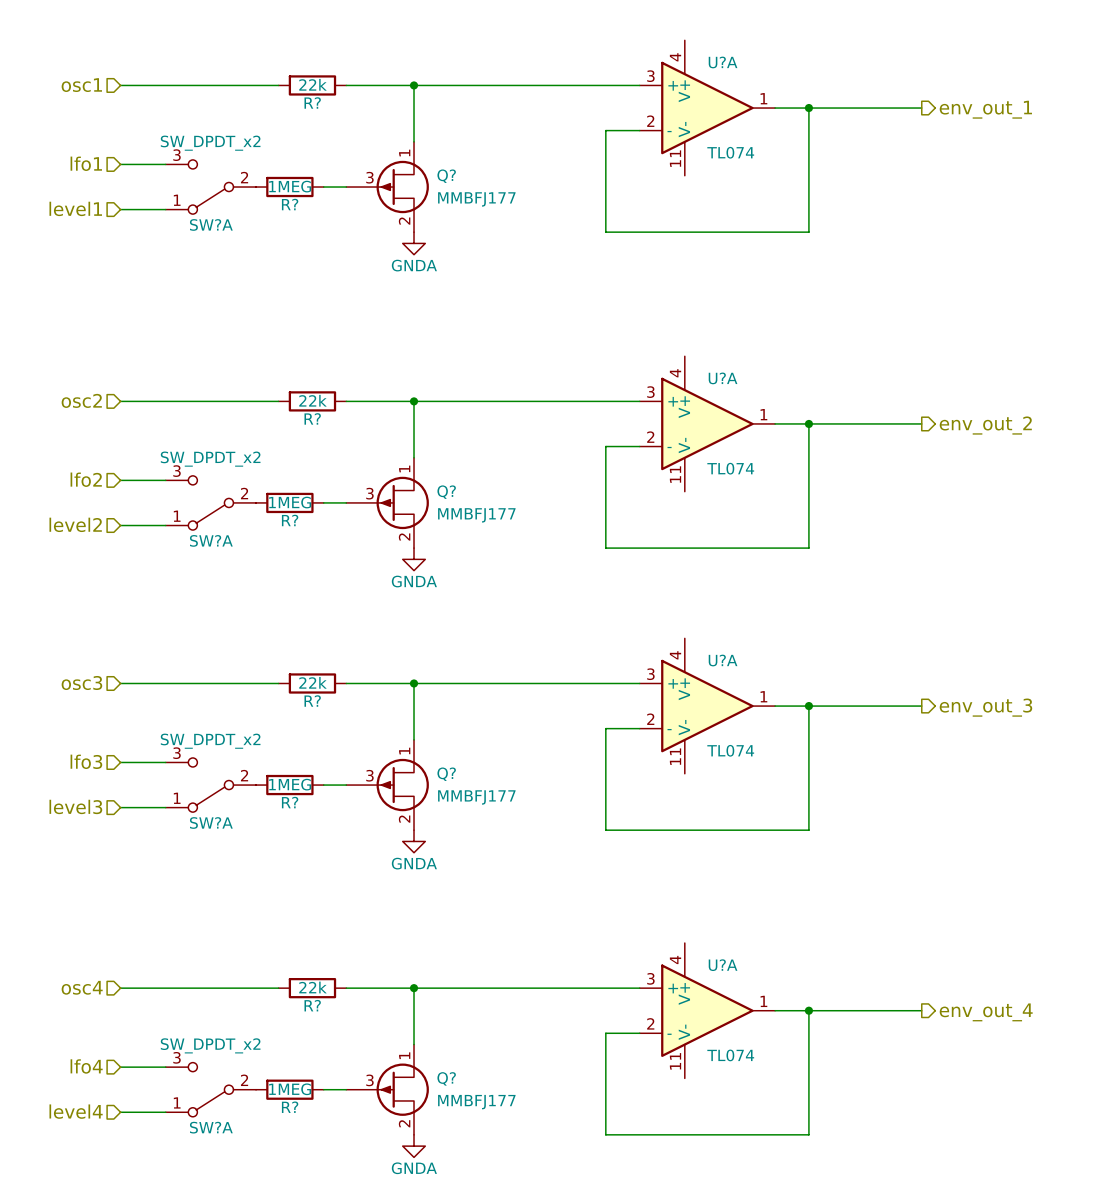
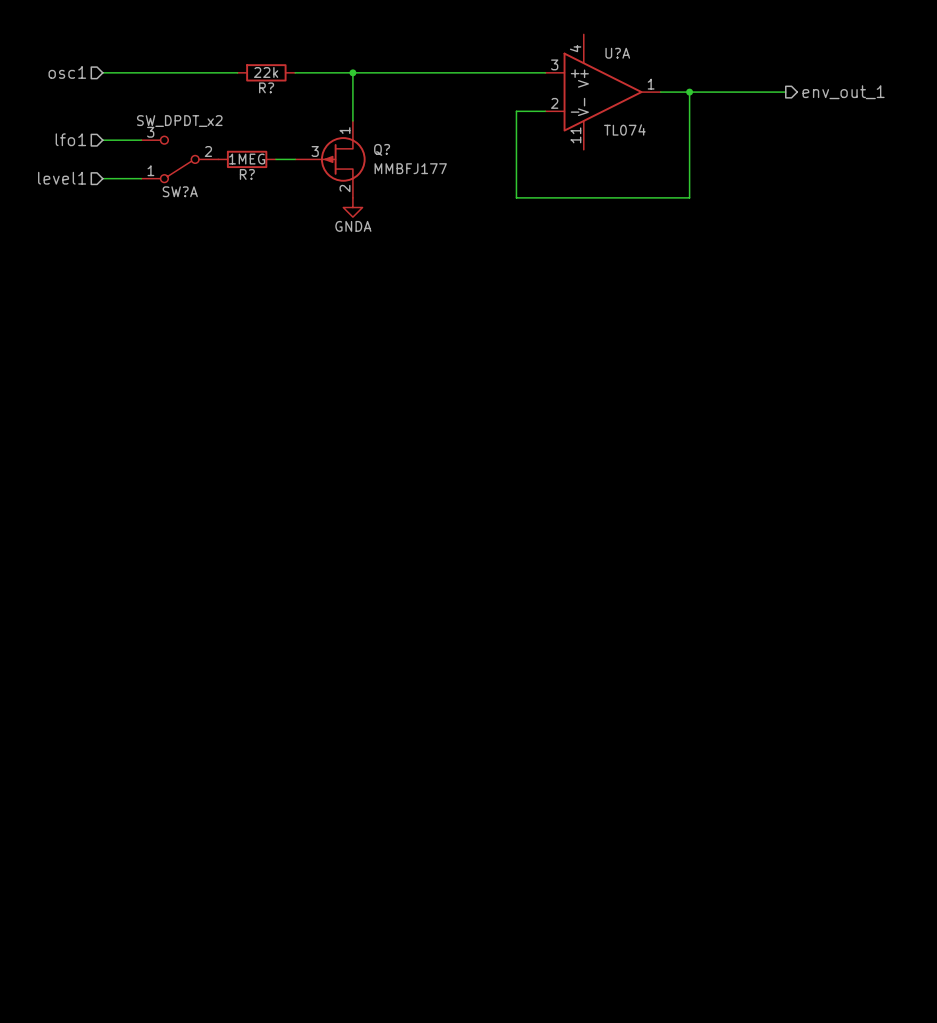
hierarchical label: osc2 (81, 400) -> none
wire: (120, 401) (278, 401) -> none
R?: 22k (312, 401) -> none
wire: (346, 401) (639, 401) -> none
wire: (414, 401) (414, 457) -> none
junction: (414, 401) -> none
U?A: TL074 (707, 423) -> none
wire: (775, 423) (921, 423) -> none
wire: (808, 423) (808, 548) (605, 548) (605, 446) (639, 446) -> none
junction: (808, 423) -> none
hierarchical label: env_out_2 (985, 425) -> none
hierarchical label: lfo2 (86, 479) -> none
wire: (120, 480) (165, 480) -> none
SW?A: SW_DPDT_x2 (210, 502) -> none
R?: 1MEG (289, 502) -> none
wire: (323, 502) (346, 502) -> none
Q?: MMBFJ177 (387, 502) -> none
hierarchical label: level2 (75, 524) -> none
wire: (120, 525) (165, 525) -> none
power symbol: GNDA (414, 559) -> none
hierarchical label: osc3 (81, 682) -> none
wire: (120, 683) (278, 683) -> none
R?: 22k (312, 683) -> none
wire: (346, 683) (639, 683) -> none
wire: (414, 683) (414, 739) -> none
junction: (414, 683) -> none
U?A: TL074 (707, 706) -> none
wire: (775, 706) (921, 706) -> none
wire: (808, 706) (808, 830) (605, 830) (605, 728) (639, 728) -> none
junction: (808, 706) -> none
hierarchical label: env_out_3 (985, 707) -> none
hierarchical label: lfo3 (86, 761) -> none
wire: (120, 762) (165, 762) -> none
SW?A: SW_DPDT_x2 (210, 785) -> none
R?: 1MEG (289, 785) -> none
wire: (323, 785) (346, 785) -> none
Q?: MMBFJ177 (387, 785) -> none
hierarchical label: level3 (75, 806) -> none
wire: (120, 807) (165, 807) -> none
power symbol: GNDA (414, 841) -> none
hierarchical label: osc4 (82, 987) -> none
wire: (120, 988) (278, 988) -> none
R?: 22k (312, 988) -> none
wire: (346, 988) (639, 988) -> none
wire: (414, 988) (414, 1044) -> none
junction: (414, 988) -> none
U?A: TL074 (707, 1010) -> none
wire: (775, 1010) (921, 1010) -> none
wire: (808, 1010) (808, 1134) (605, 1134) (605, 1033) (639, 1033) -> none
junction: (808, 1010) -> none
hierarchical label: env_out_4 (986, 1012) -> none
hierarchical label: lfo4 (86, 1066) -> none
wire: (120, 1067) (165, 1067) -> none
SW?A: SW_DPDT_x2 (210, 1089) -> none
R?: 1MEG (289, 1089) -> none
wire: (323, 1089) (346, 1089) -> none
Q?: MMBFJ177 (387, 1089) -> none
hierarchical label: level4 (76, 1111) -> none
wire: (120, 1112) (165, 1112) -> none
power symbol: GNDA (414, 1146) -> none

